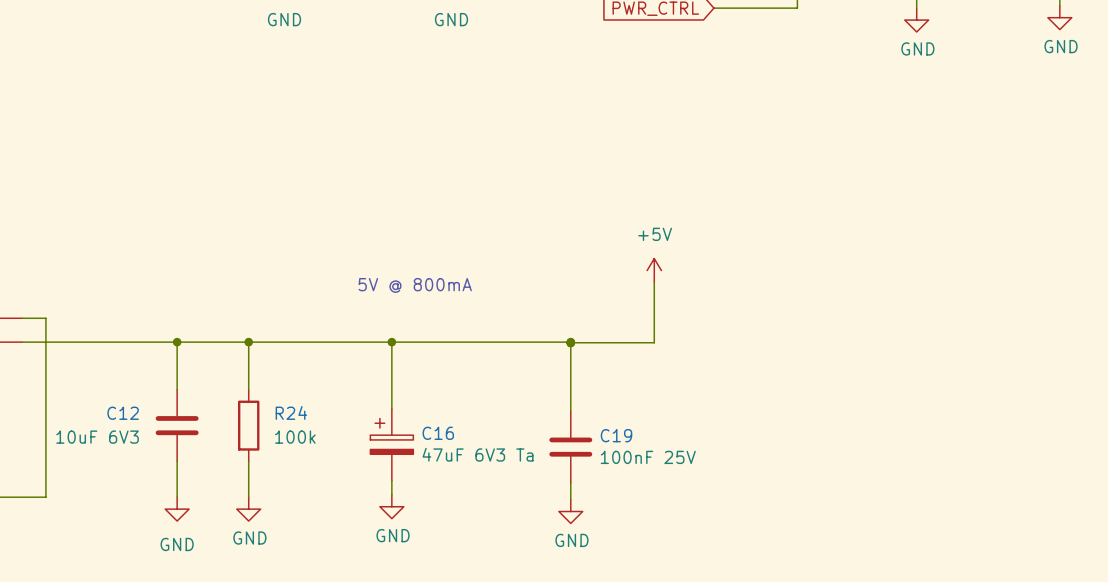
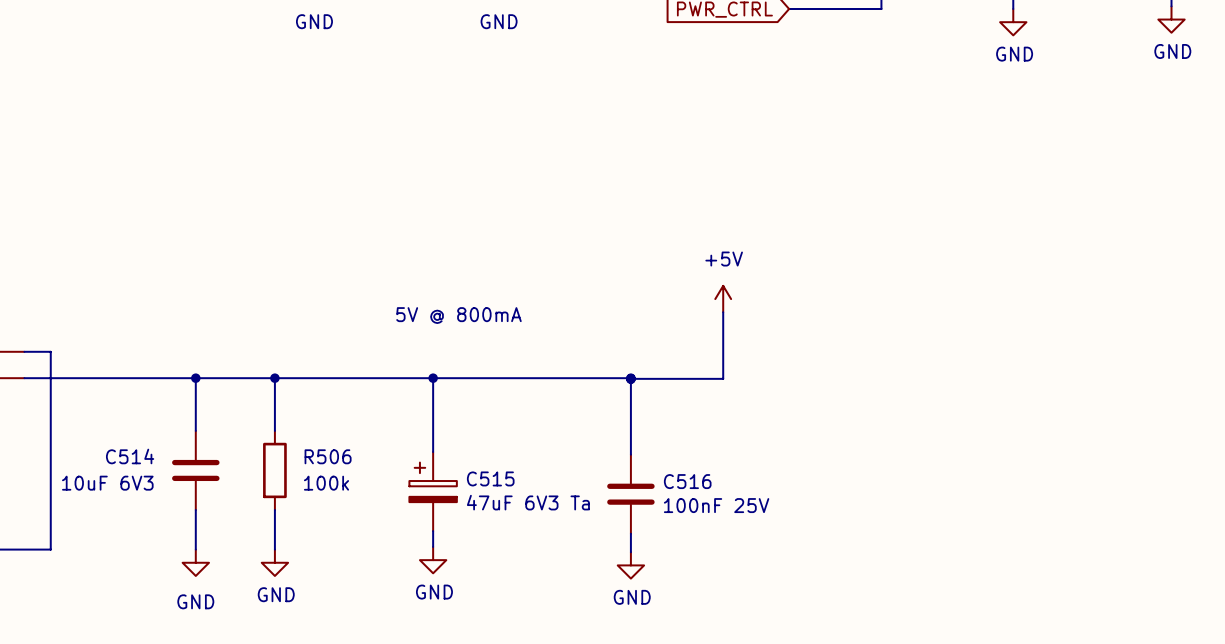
R24 name: R24 (291, 412) -> R506 (328, 456)
C12 name: C12 (123, 413) -> C514 (130, 456)
C16 name: C16 (438, 433) -> C515 (490, 478)
C19 name: C19 (616, 435) -> C516 (687, 481)

